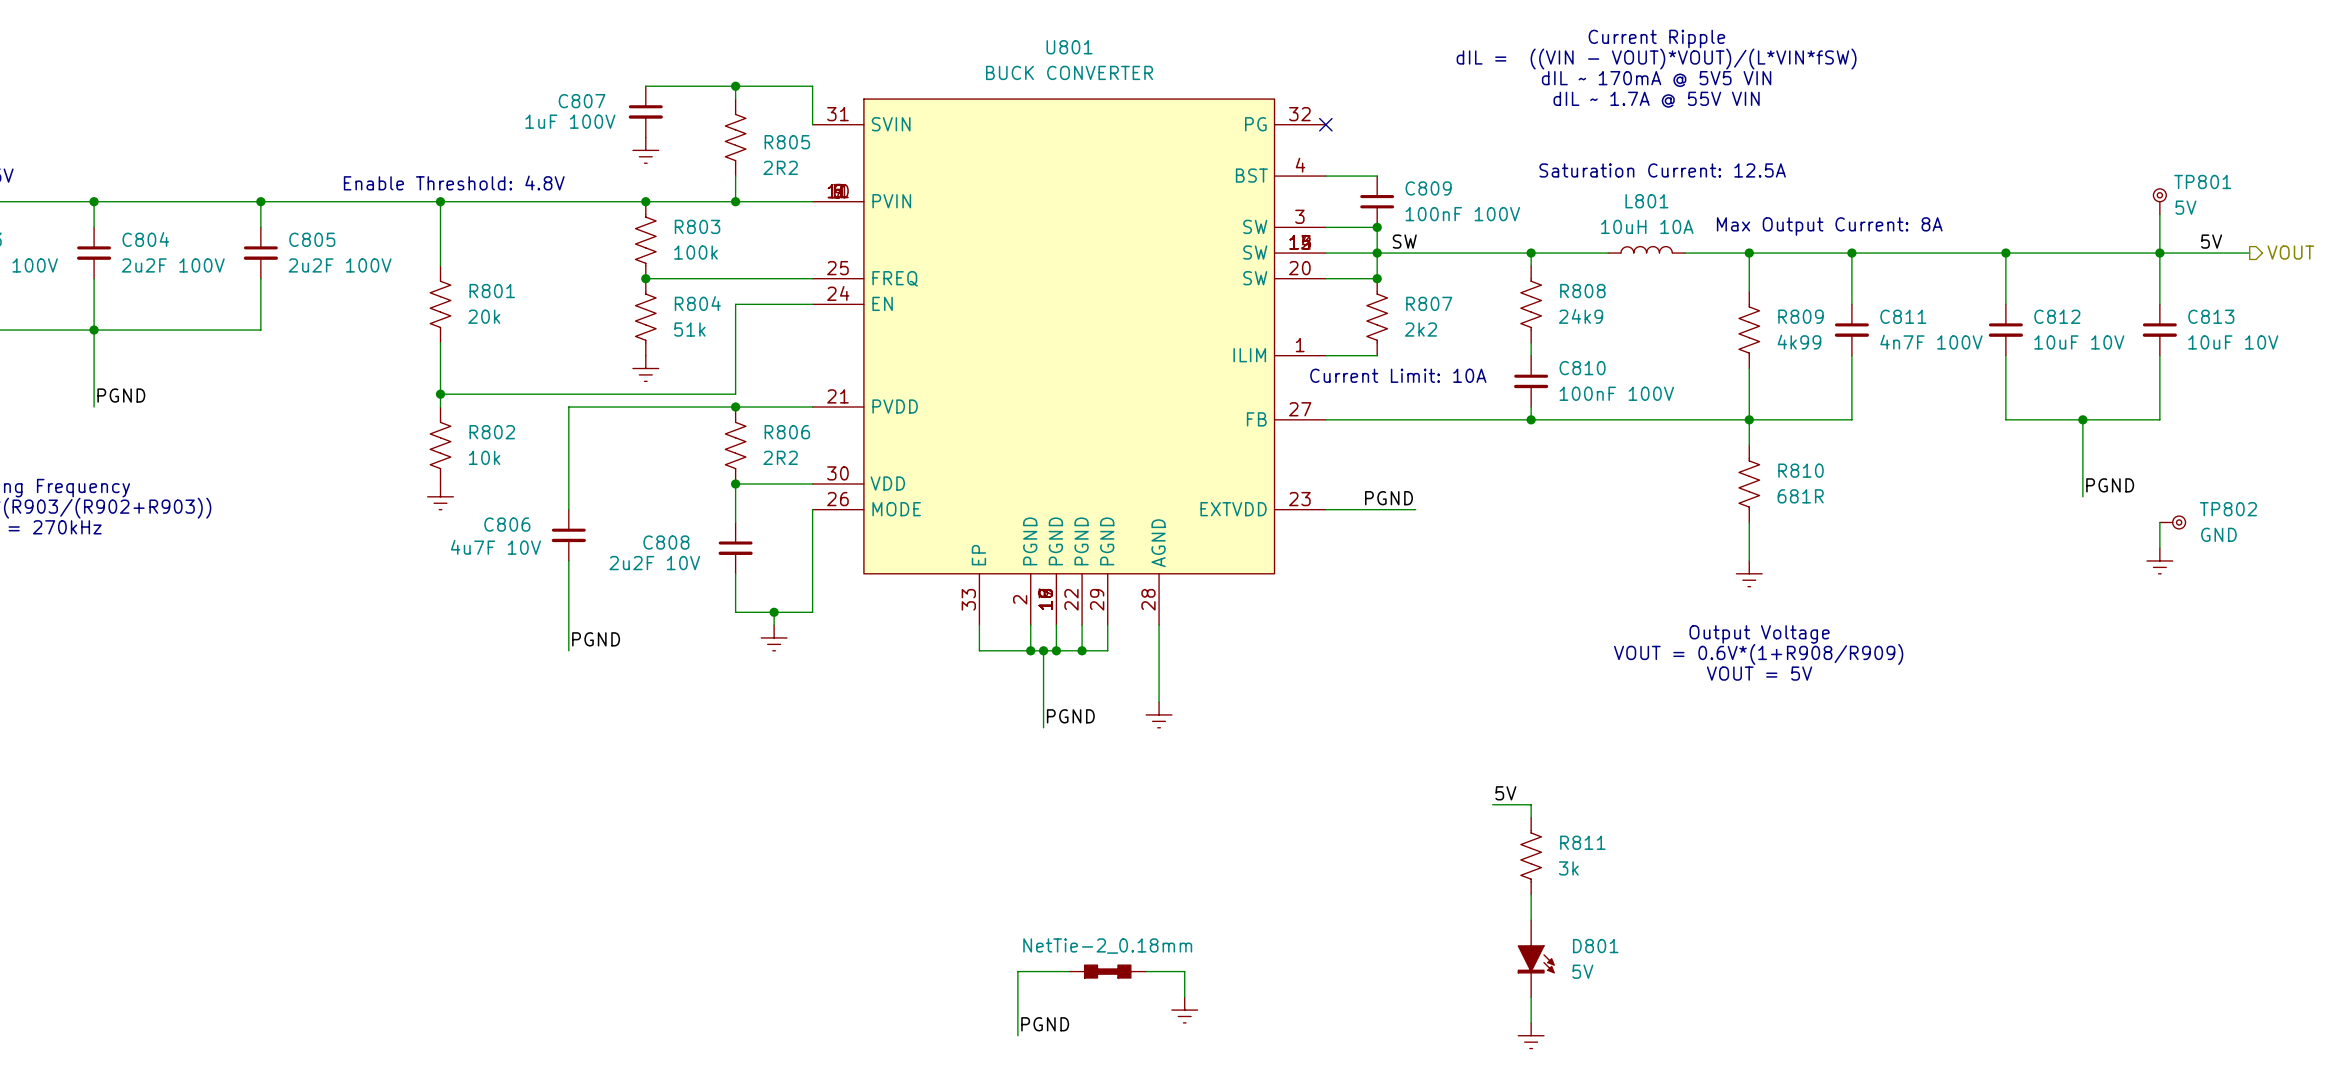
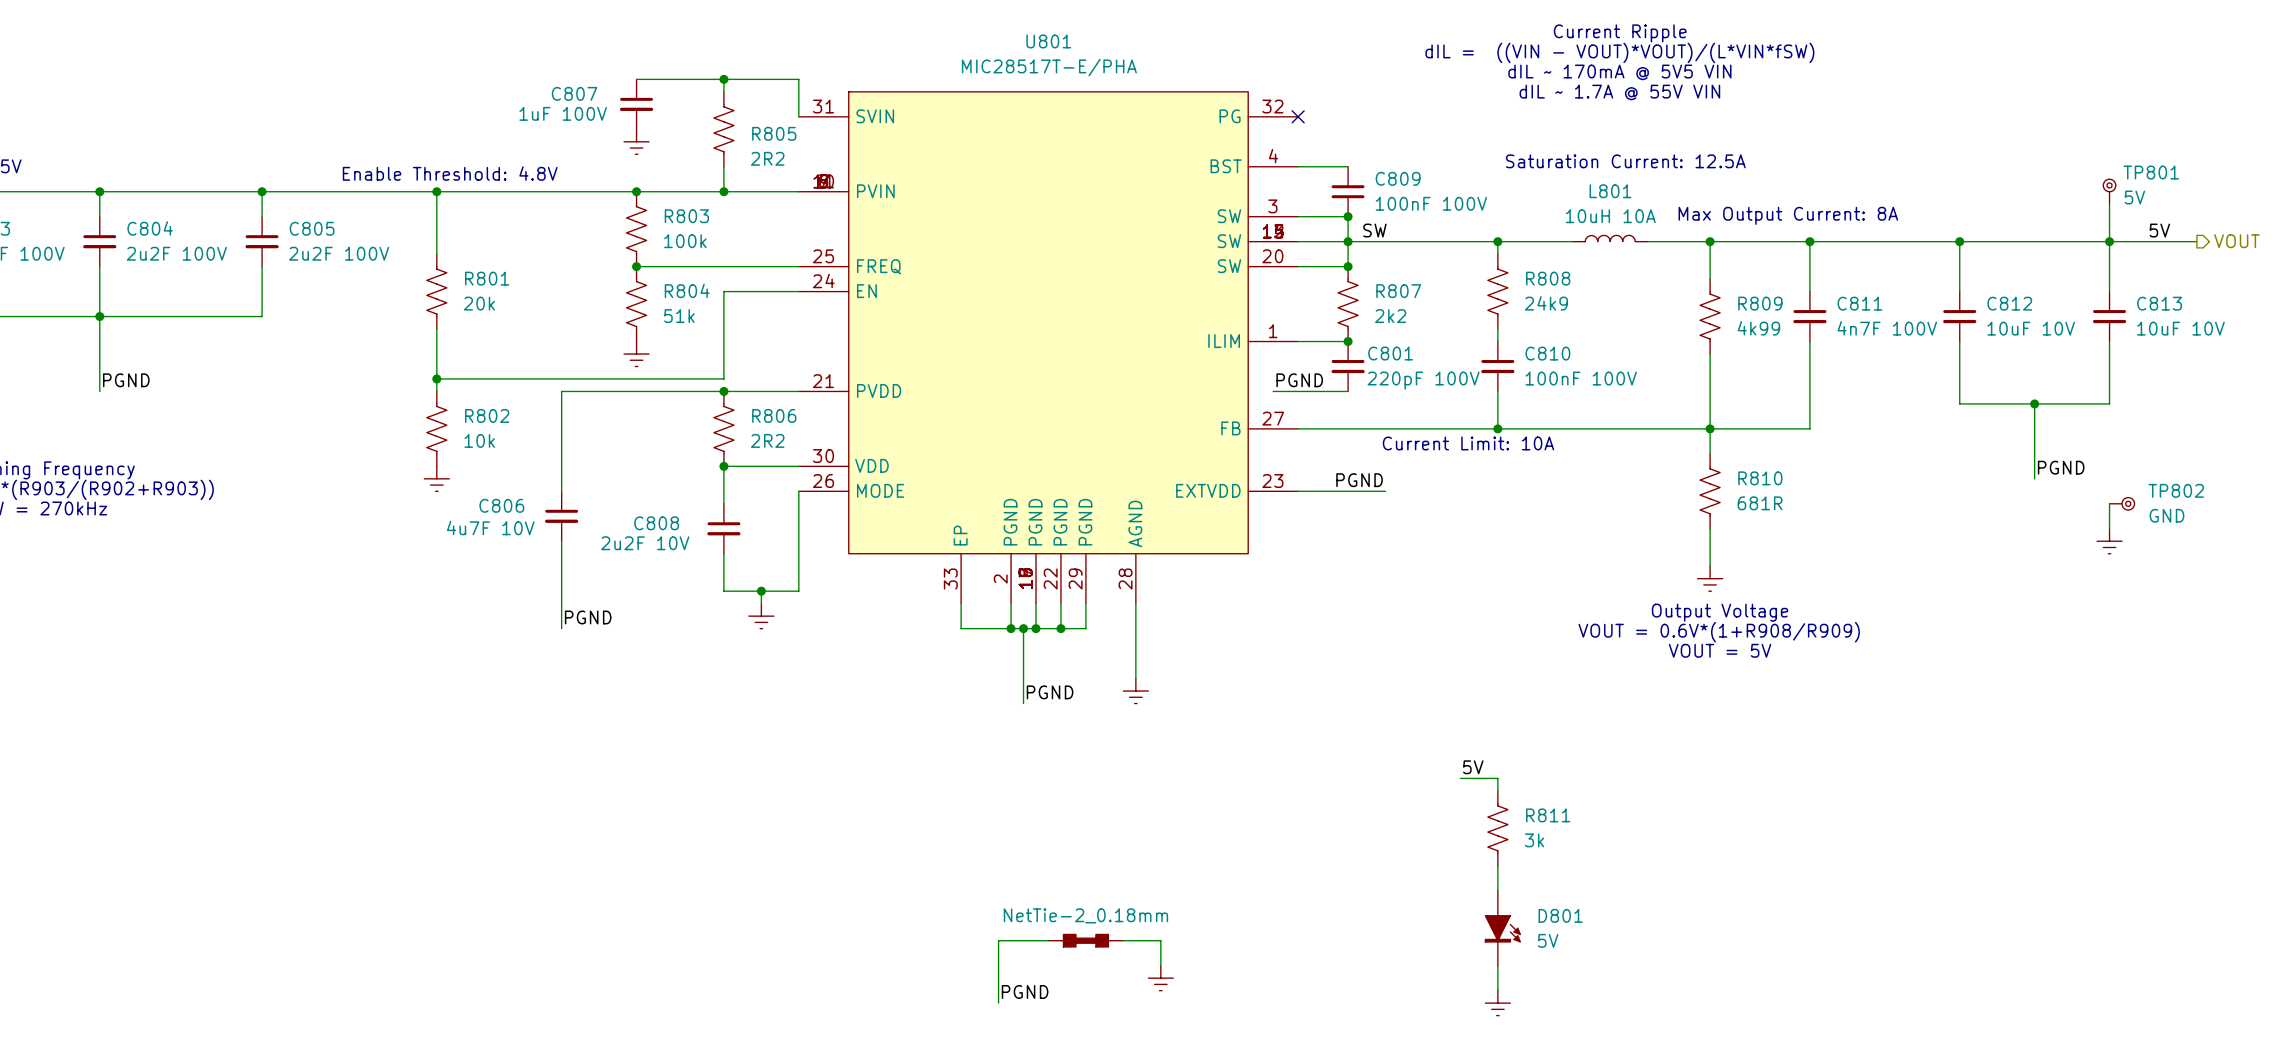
U801 value: BUCK CONVERTER (1069, 72) -> MIC28517T-E/PHA (1049, 67)
U801 symbol: [812, 99, 1326, 626] -> [798, 91, 1299, 604]
junction: none -> (1348, 341)
text position: Current Limit: 10A (1398, 375) -> Current Limit: 10A (1468, 443)
C801: none -> 220pF 100V (1348, 366)
label: none -> PGND (1299, 380)
wire: none -> (1273, 391) (1348, 391)
wire: (1325, 419) (1851, 419) -> (1298, 428) (1809, 428) (1809, 403)
wire: none -> (1497, 403) (1497, 428)
junction position: (1531, 419) -> (1497, 428)
junction position: (1749, 419) -> (1710, 428)
R810 position: (1749, 483) -> (1710, 491)
power symbol position: (1749, 573) -> (1710, 578)

